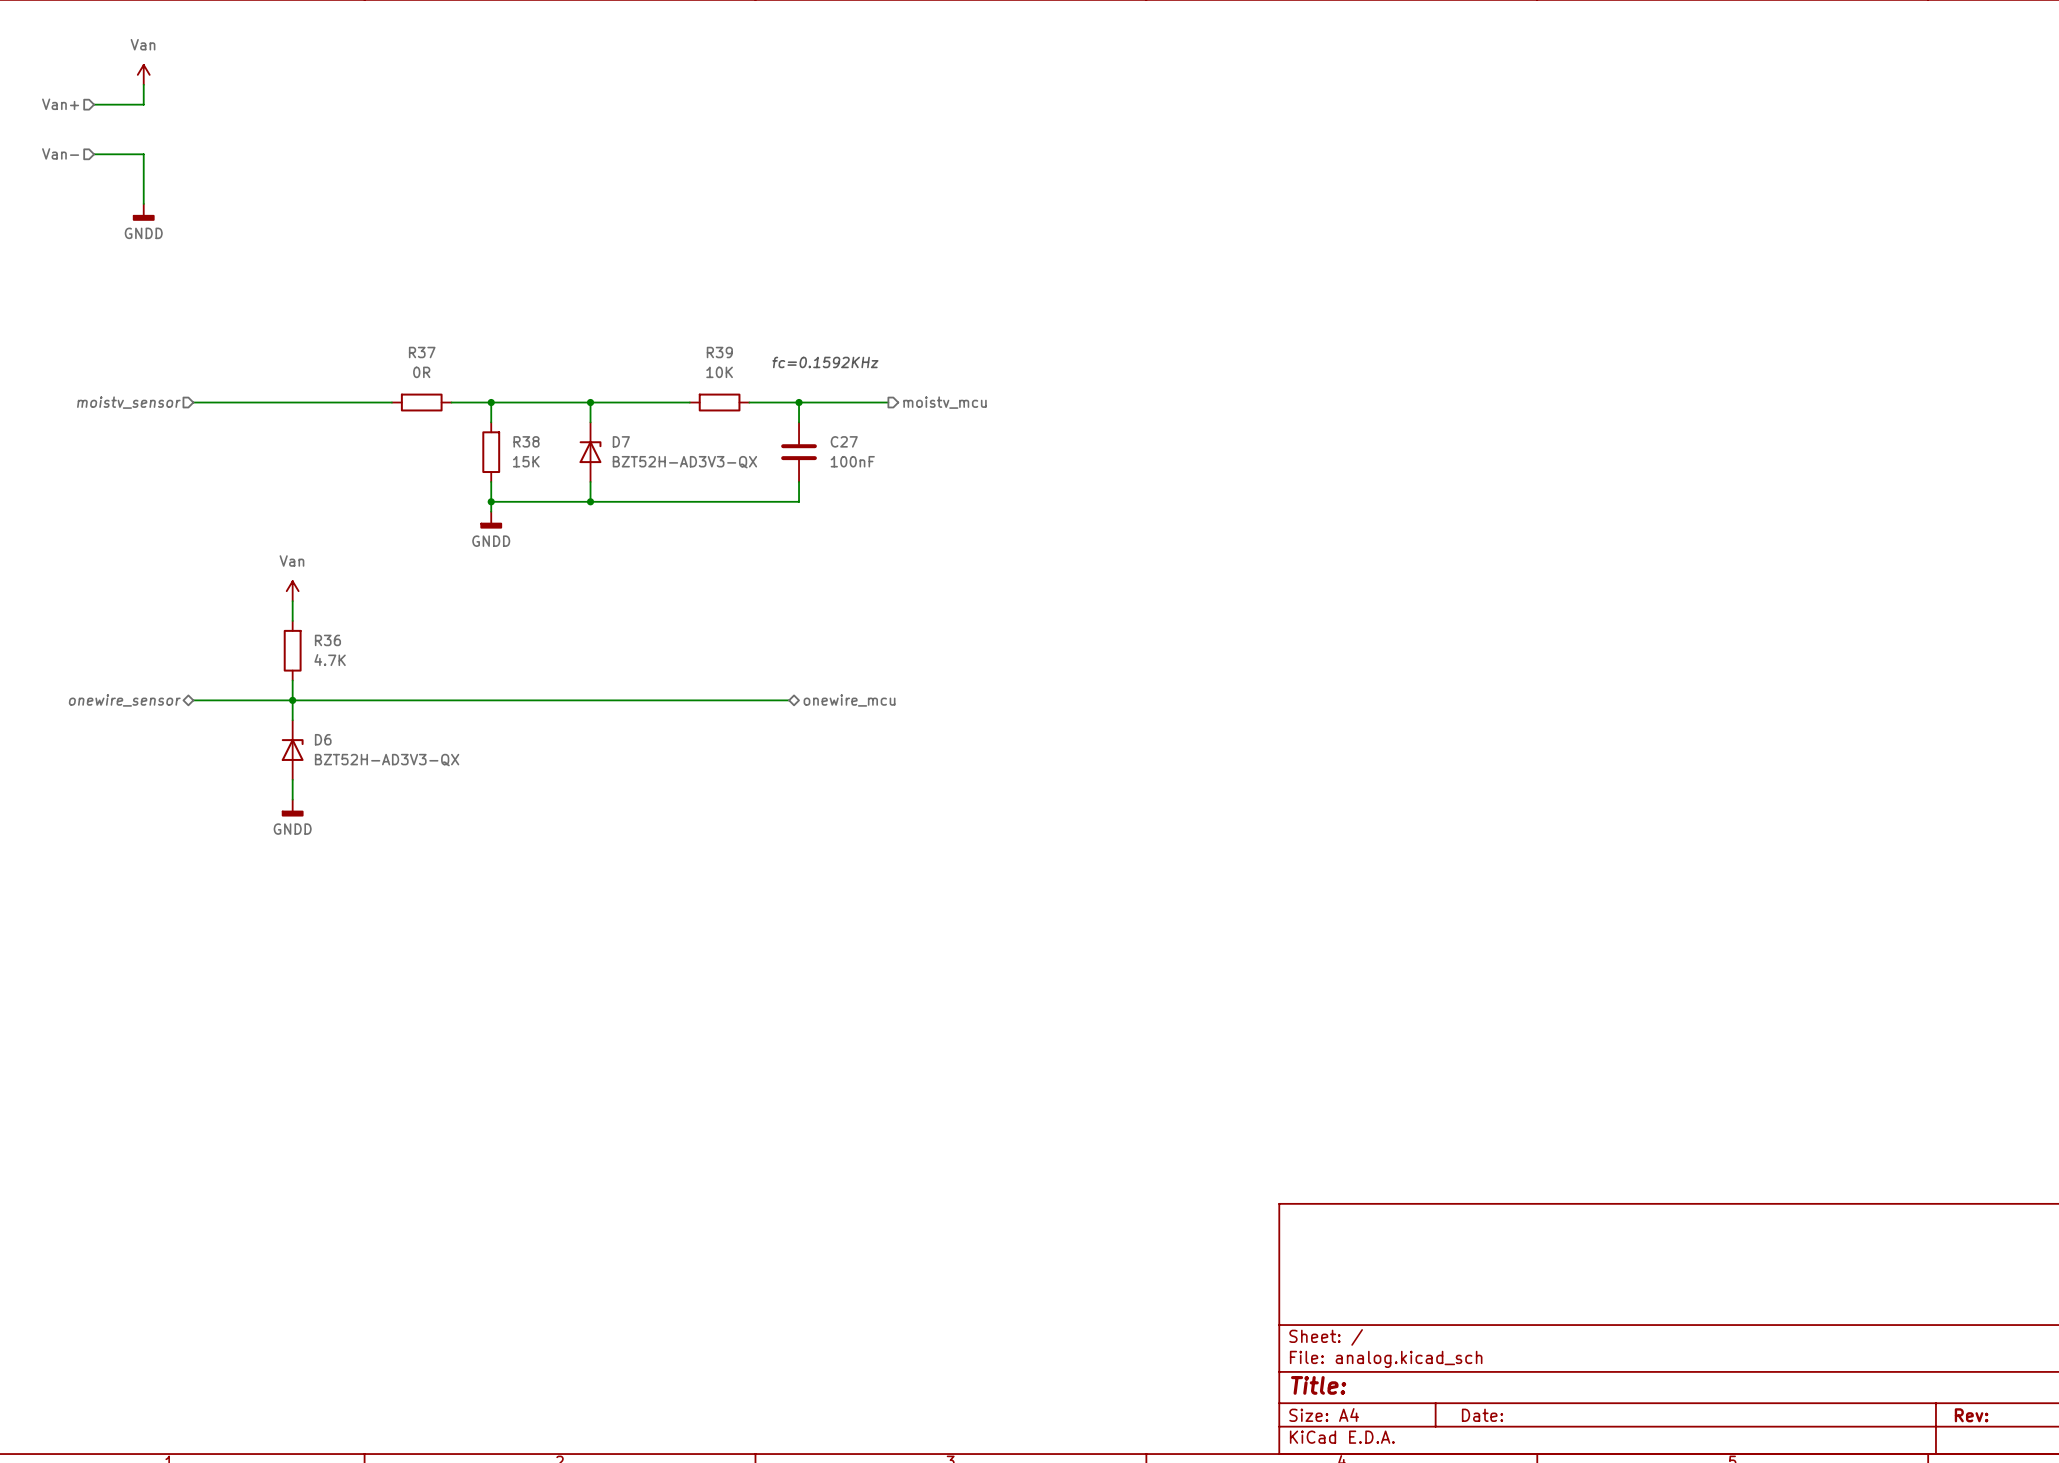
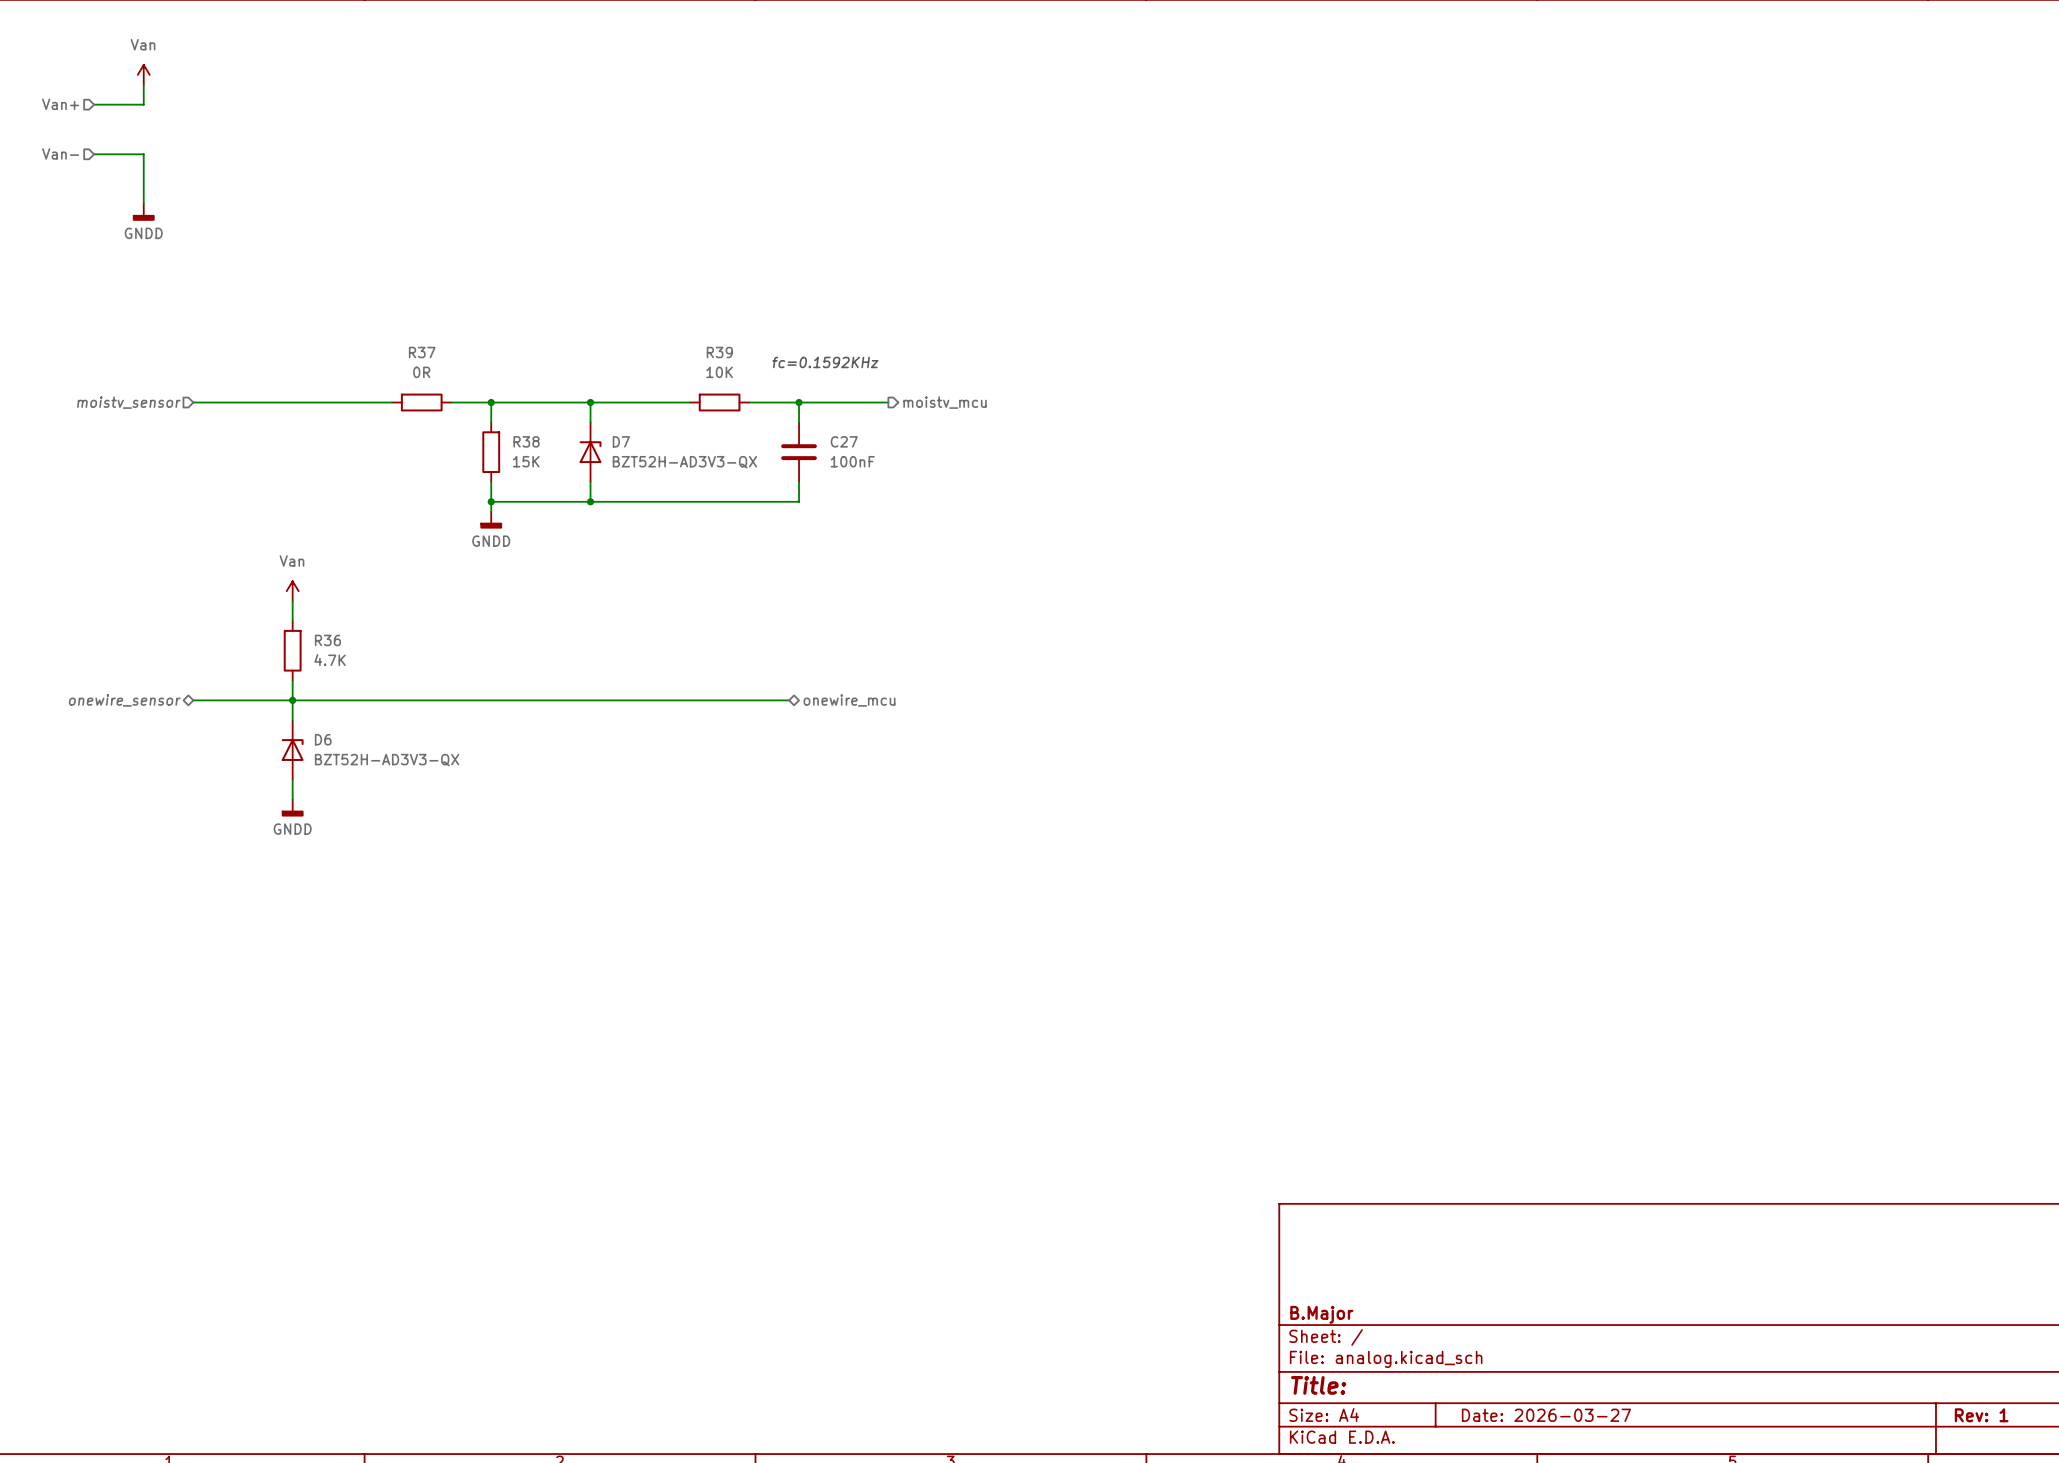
title block: none -> B.Major (1321, 1314)
title block: Date: (1482, 1415) -> Date: 2026-03-27 (1546, 1415)
title block: Rev: (1971, 1415) -> Rev: 1 (1981, 1415)

